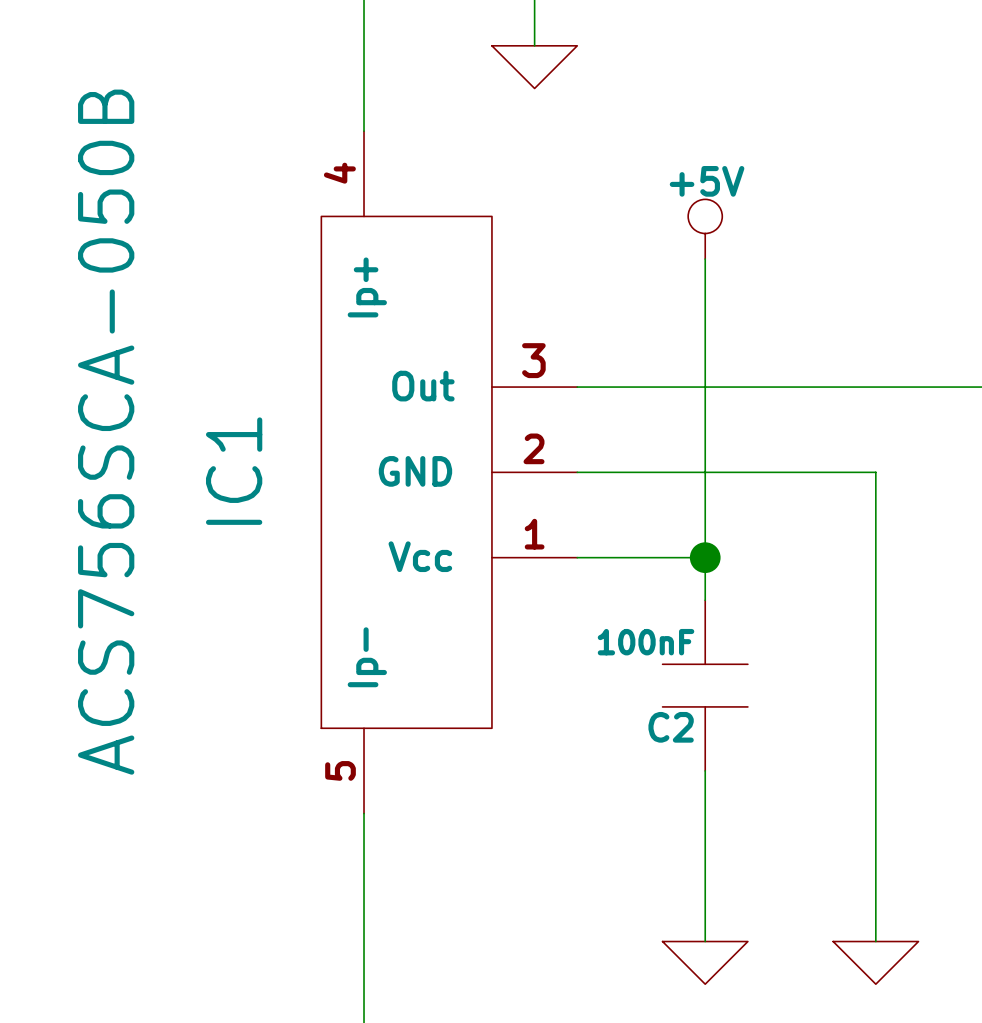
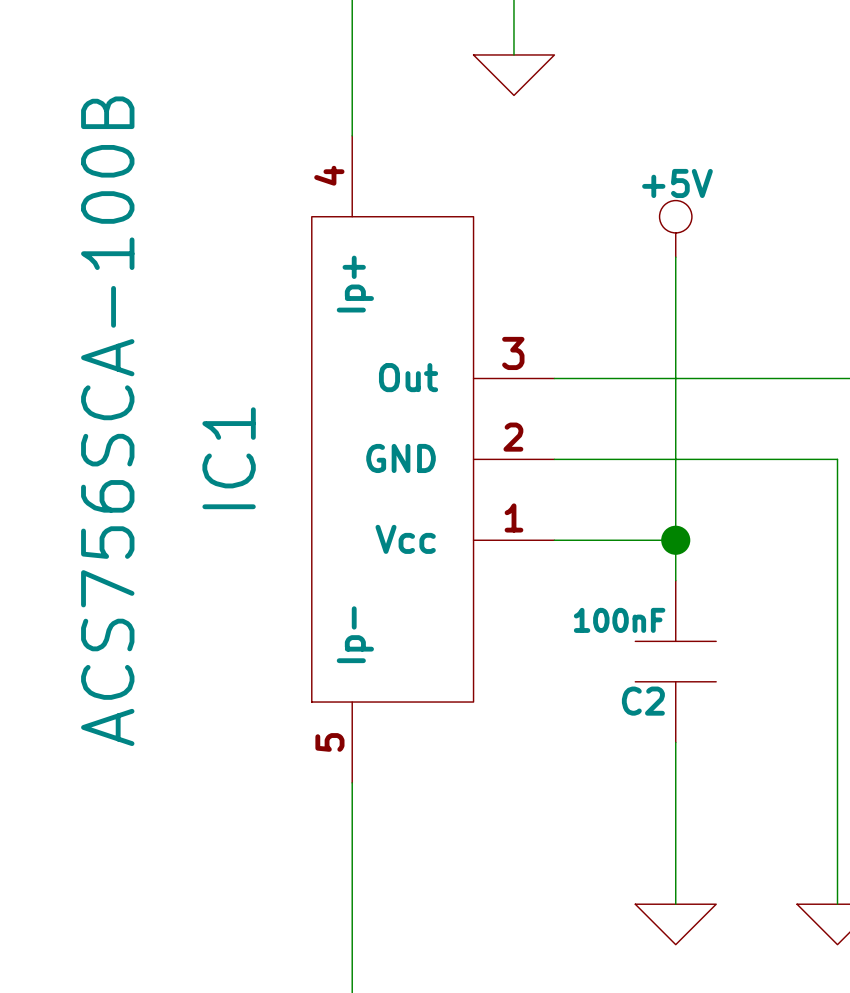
IC1 value: ACS756SCA-050B (106, 432) -> ACS756SCA-100B (107, 421)

